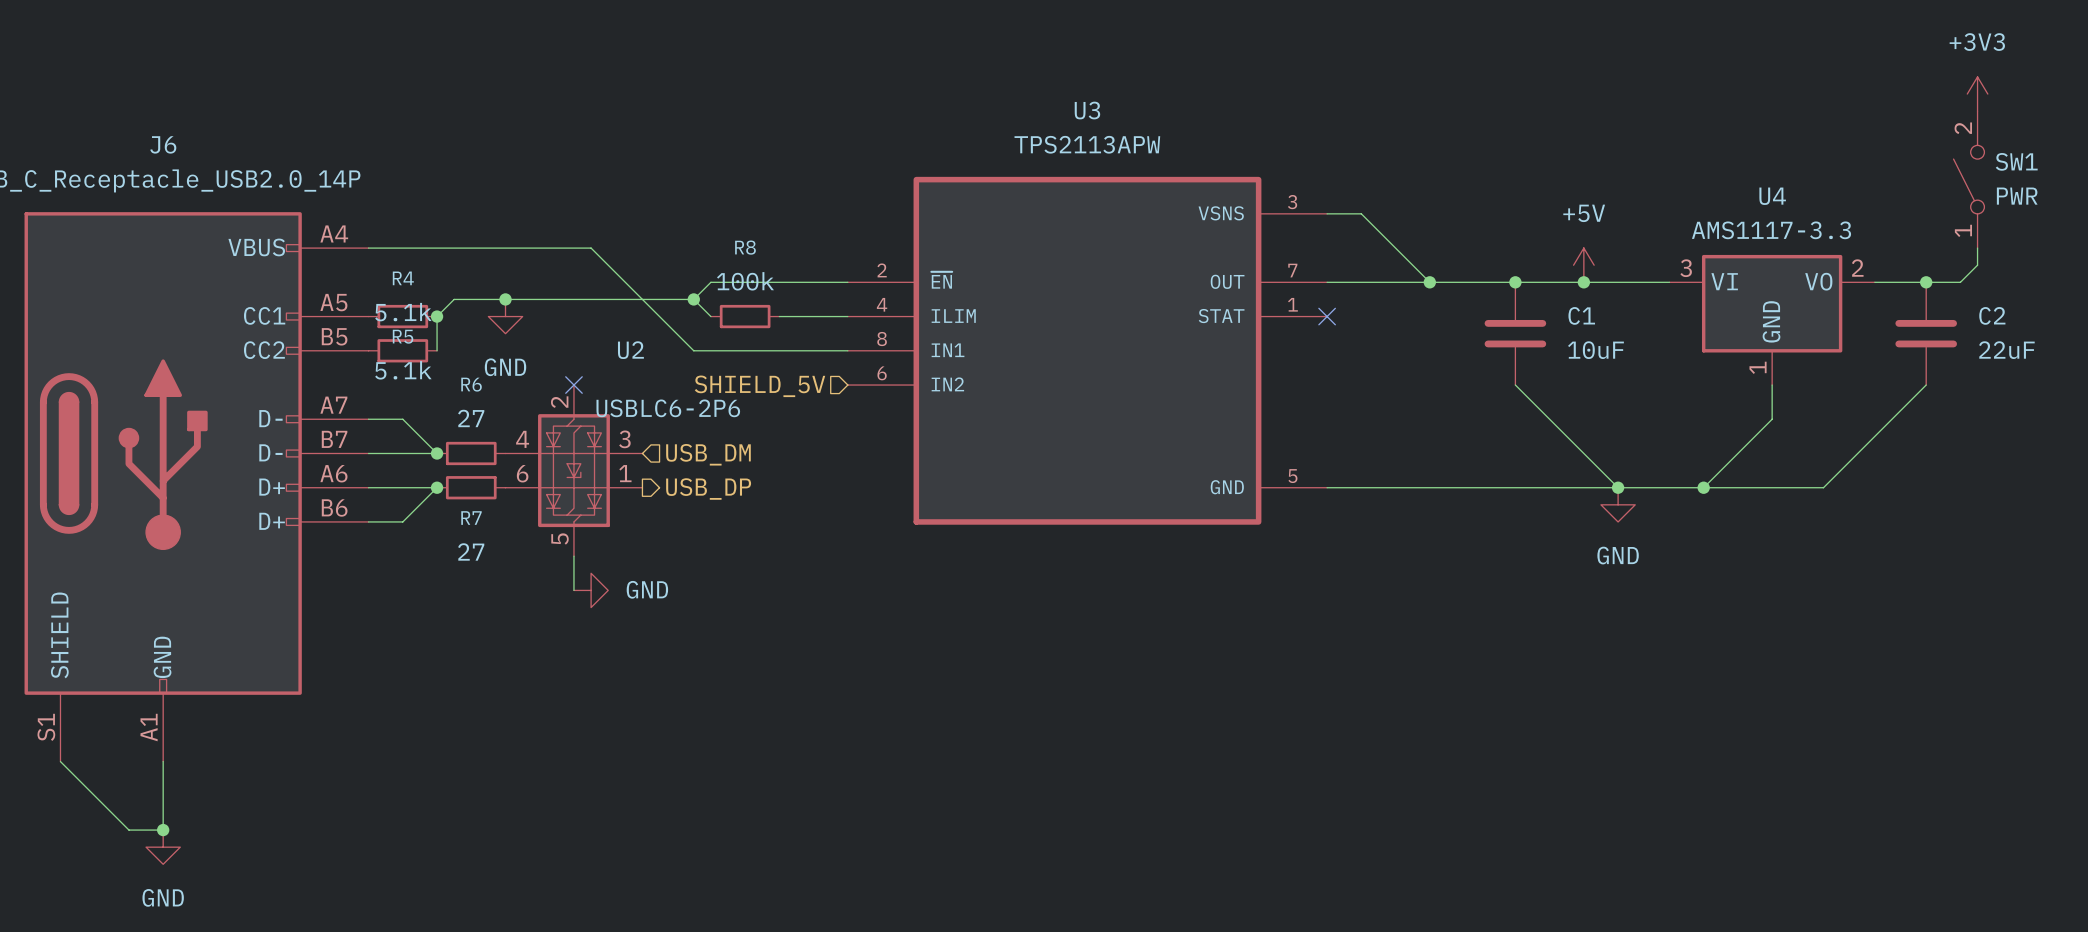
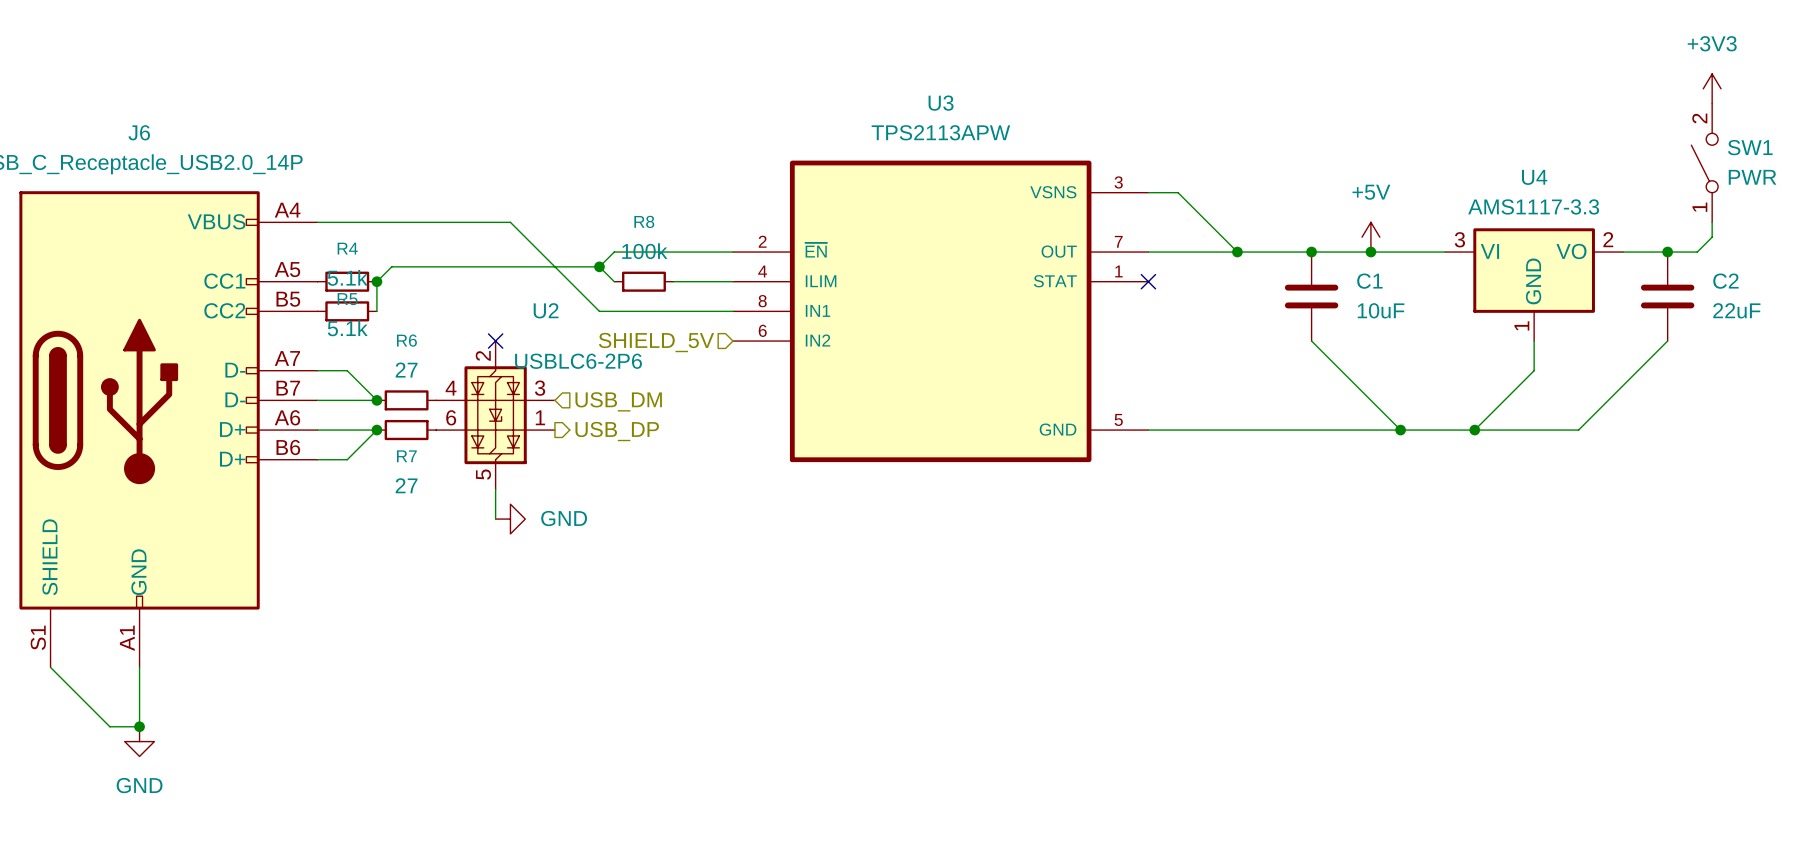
junction: (505, 299) -> none
power symbol: GND (505, 316) -> none
power symbol: GND (1618, 504) -> none

